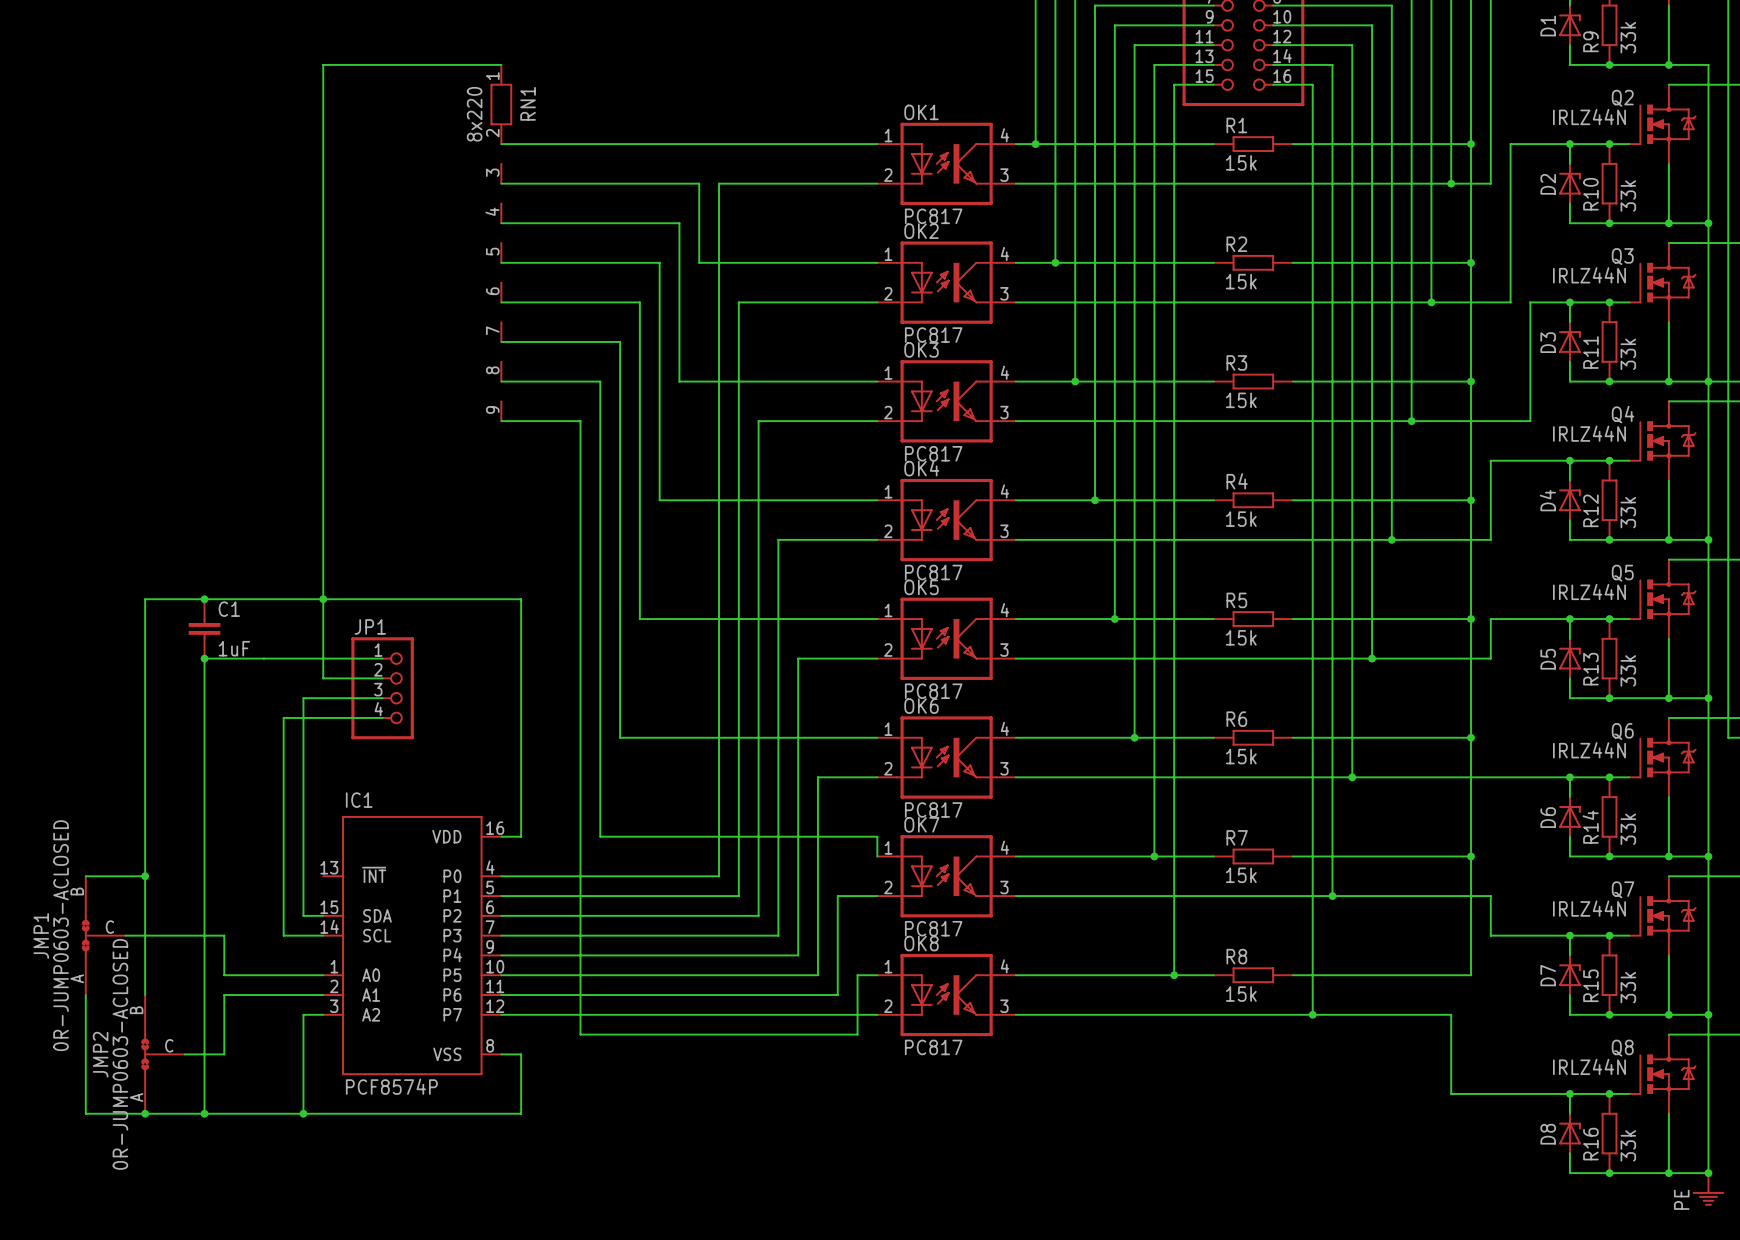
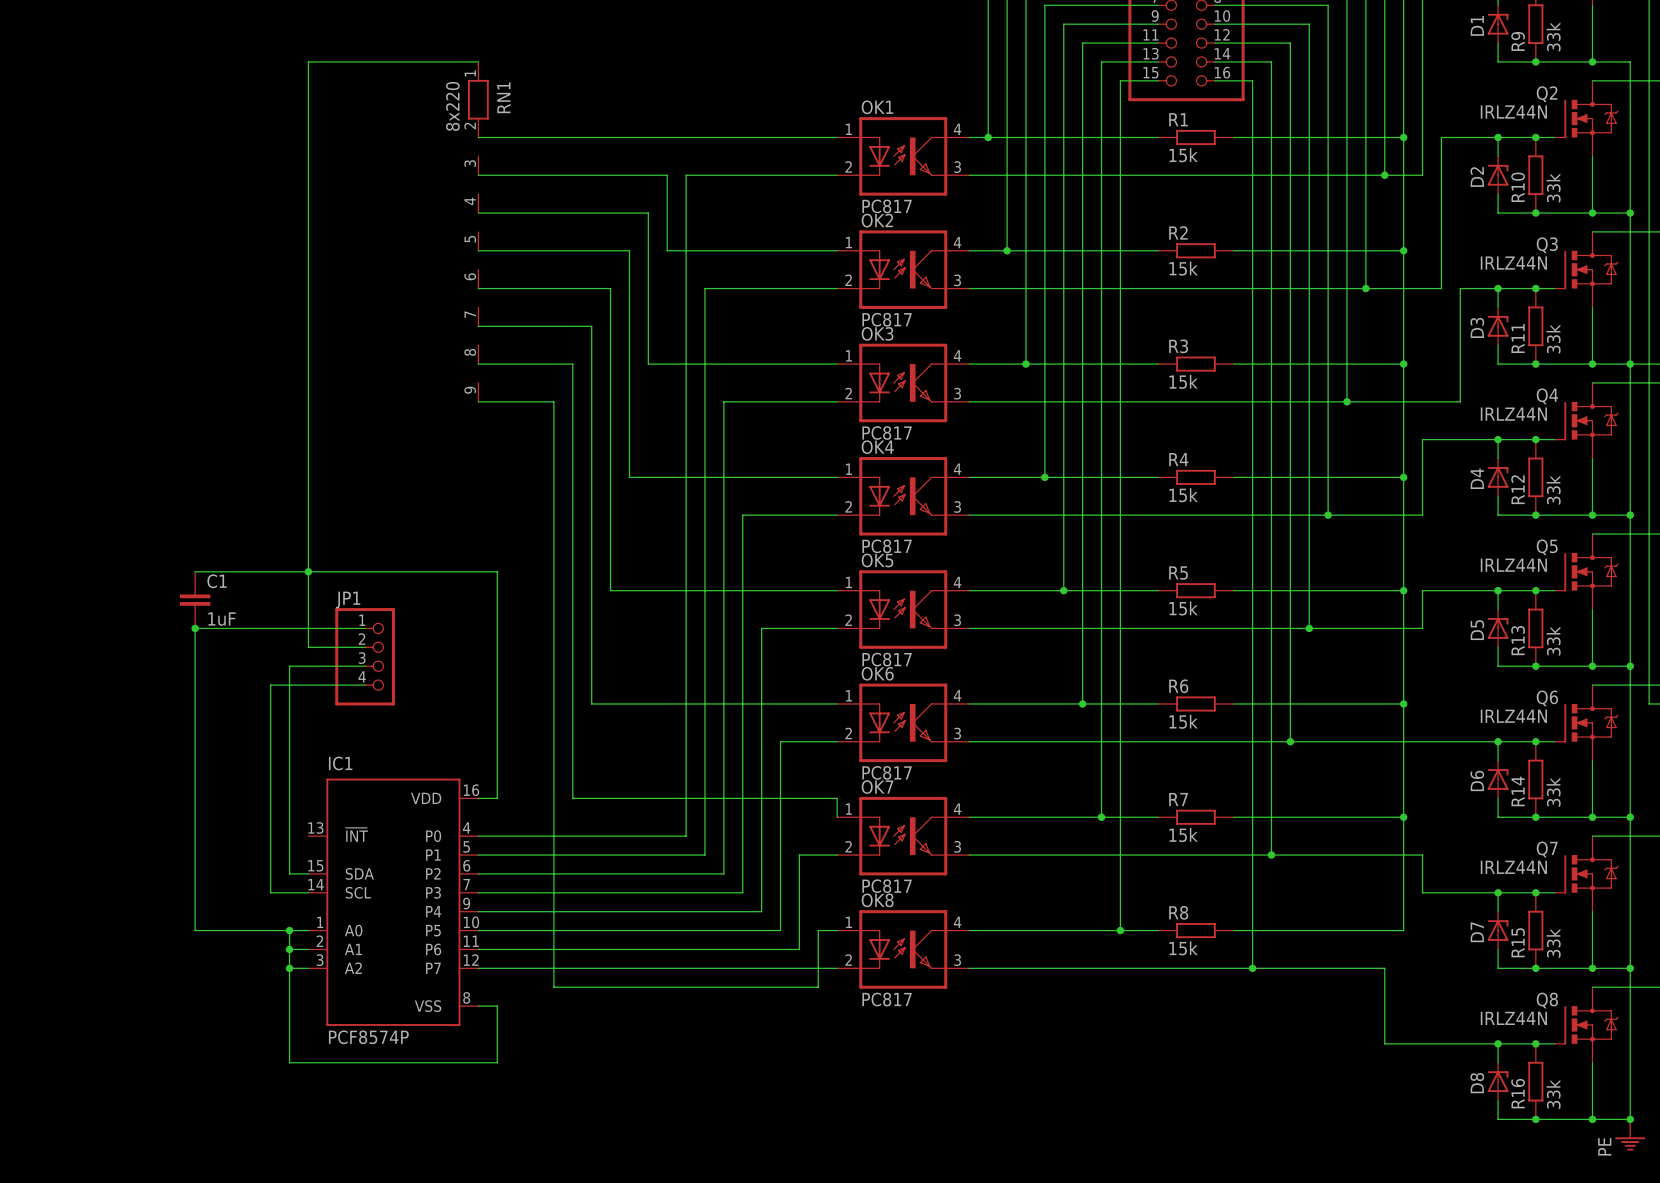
wire: (204, 599) (145, 599) (145, 995) -> none
junction: (204, 599) -> none
wire: (85, 876) (145, 876) -> none
junction: (145, 876) -> none
JMP1: 0R-JUMP0603-ACLOSED (103, 935) -> none
wire: (125, 935) (224, 935) (224, 975) -> (195, 930) (214, 930)
wire: (204, 975) (204, 1113) -> none
wire: none -> (289, 930) (289, 968)
junction: none -> (289, 930)
wire: (85, 995) (85, 1113) (303, 1113) -> none
wire: (303, 995) (224, 995) (224, 1054) (184, 1054) -> none
junction: none -> (289, 949)
junction: none -> (289, 968)
JMP2: 0R-JUMP0603-ACLOSED (162, 1054) -> none
junction: (145, 1113) -> none
junction: (204, 1113) -> none
junction: (303, 1113) -> none

